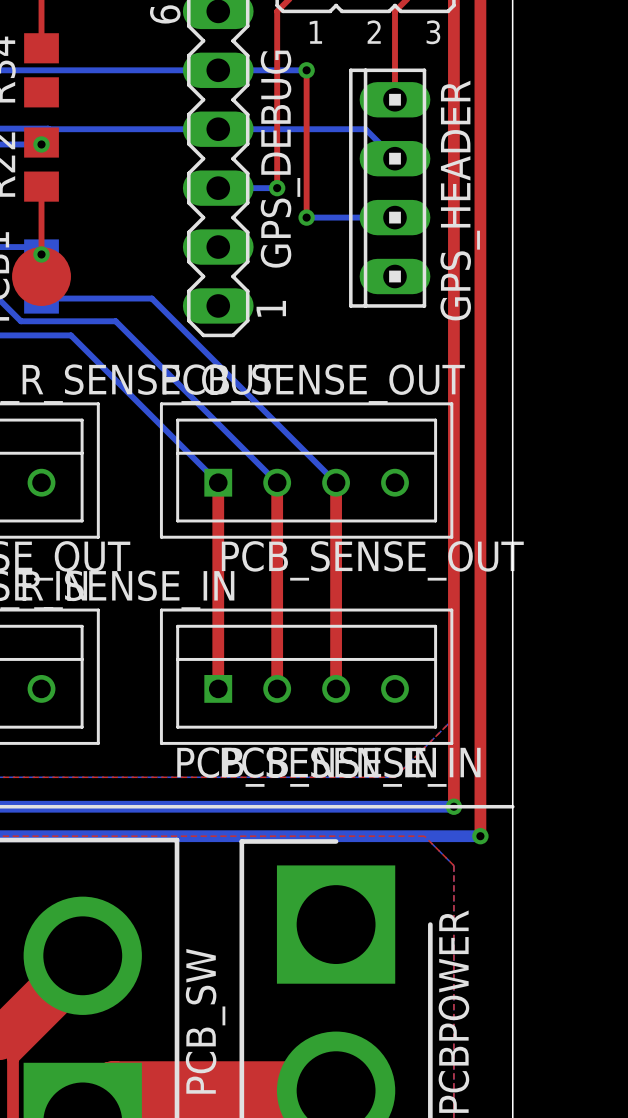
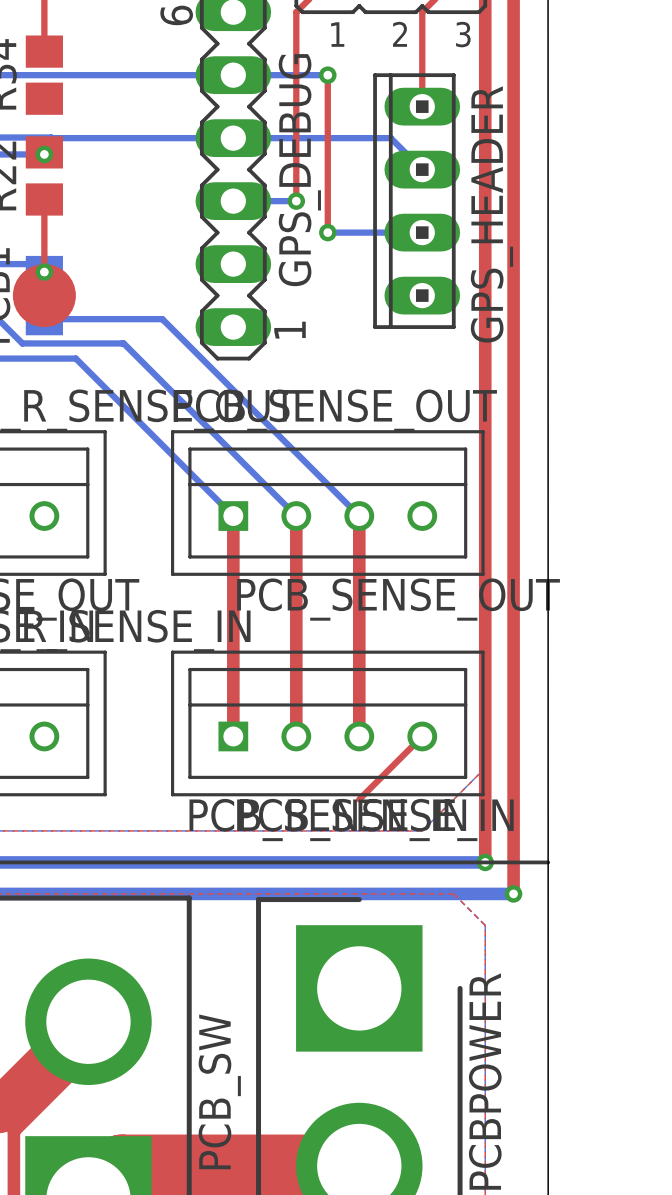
top track: none -> (422, 736) (359, 799)

